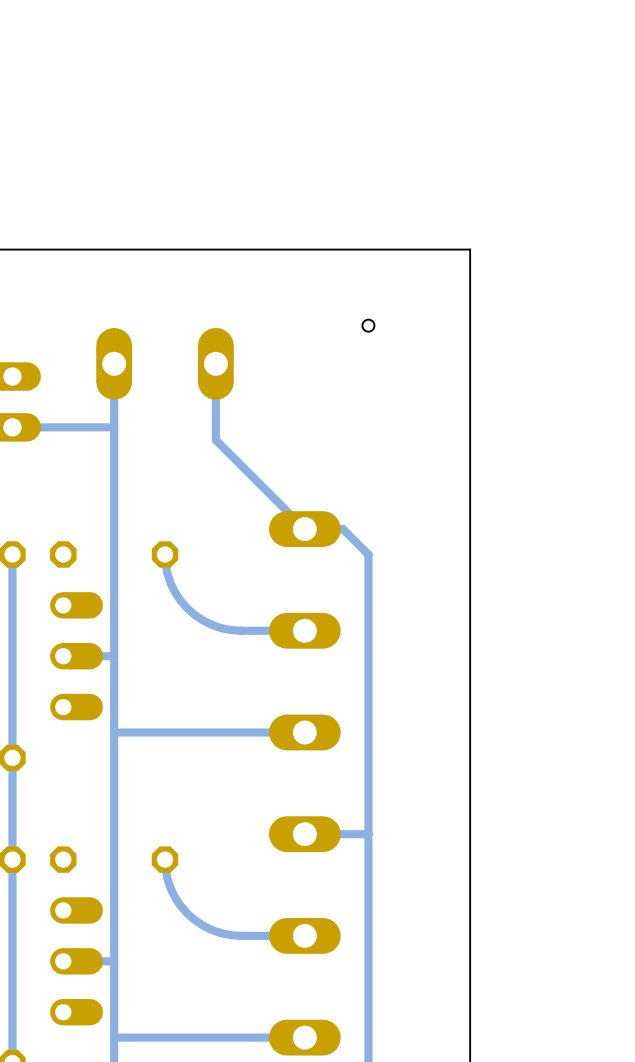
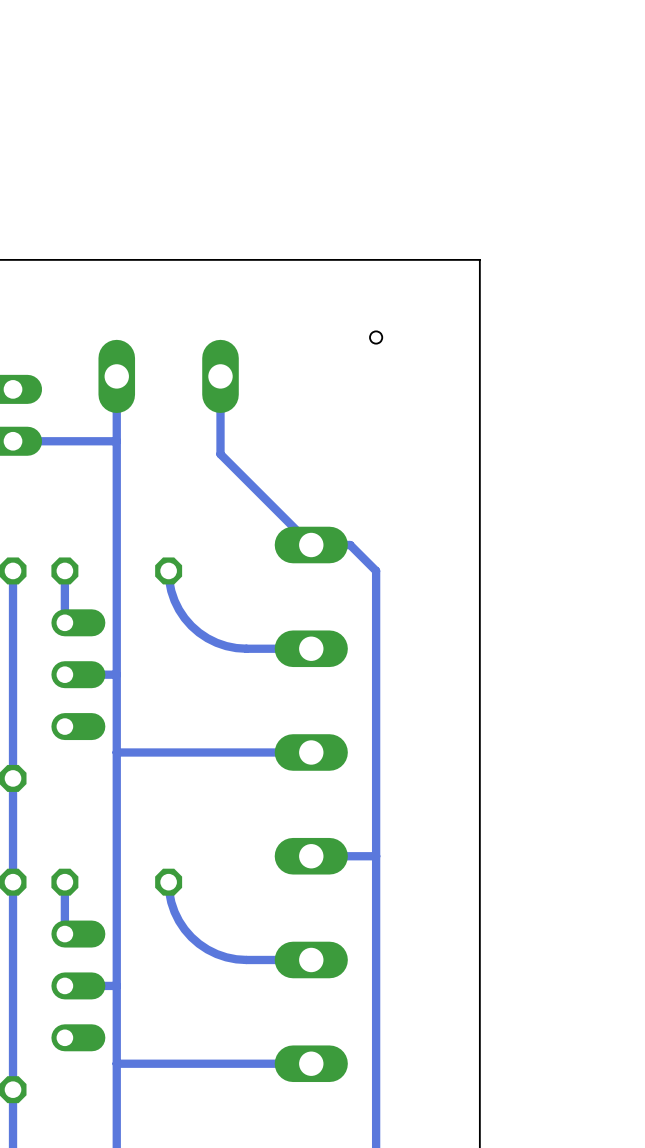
bottom track: none -> (64, 570) (64, 622)
bottom track: none -> (64, 882) (64, 934)

